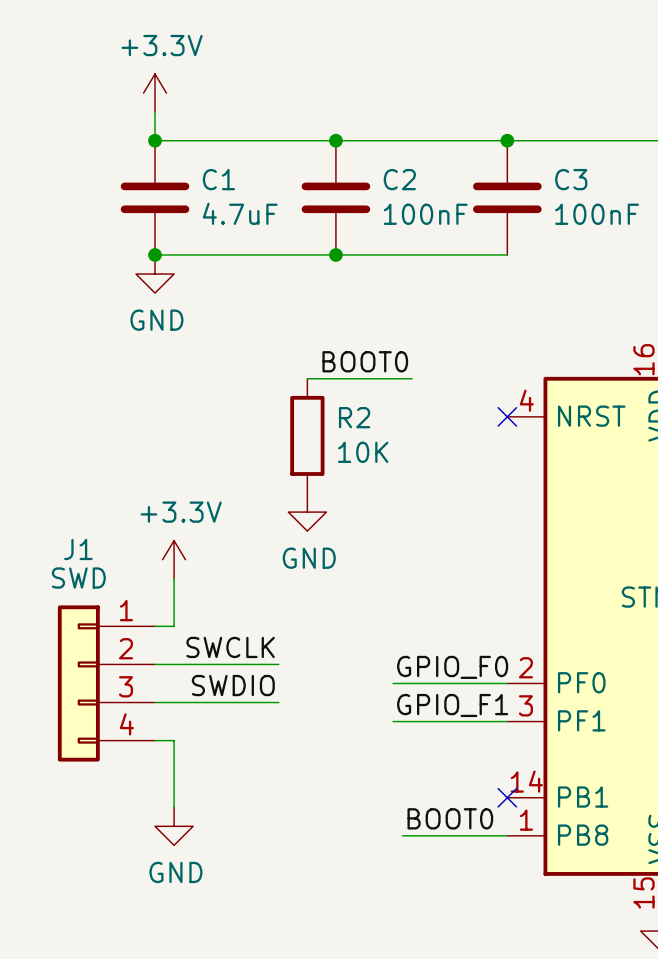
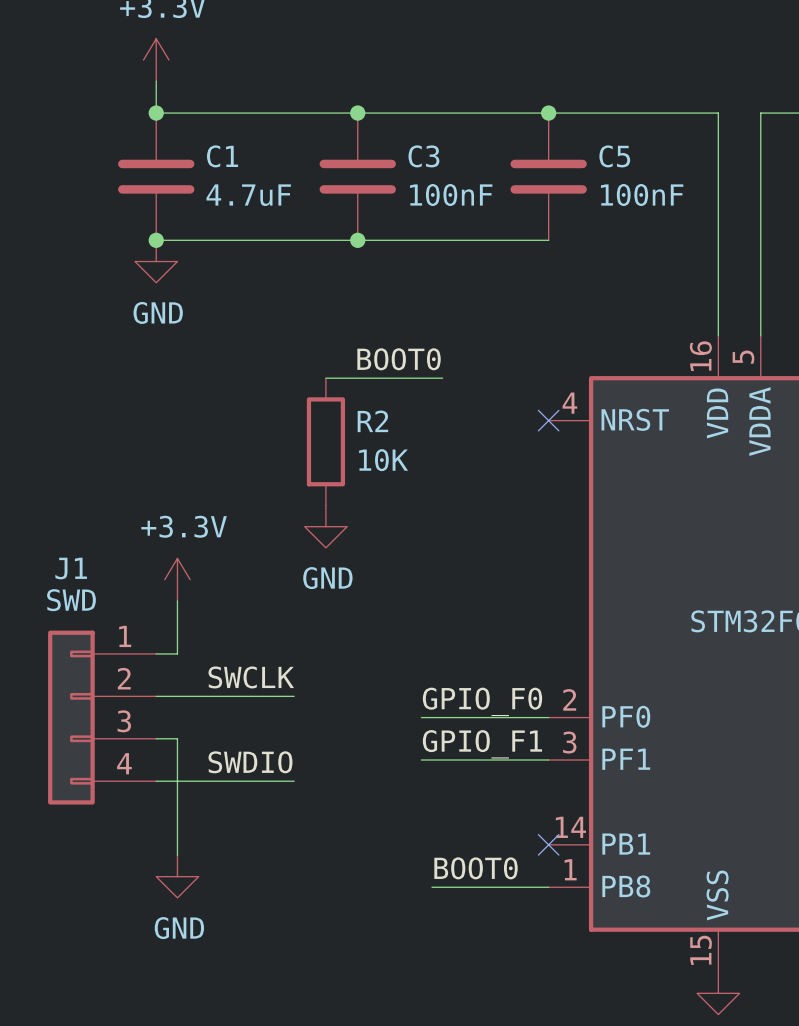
C2 name: C2 (399, 179) -> C3 (423, 156)
C3 name: C3 (571, 179) -> C5 (614, 156)
label position: SWDIO (233, 685) -> SWDIO (250, 762)
wire: (174, 702) (278, 702) -> (177, 738) (177, 781) (294, 781)

